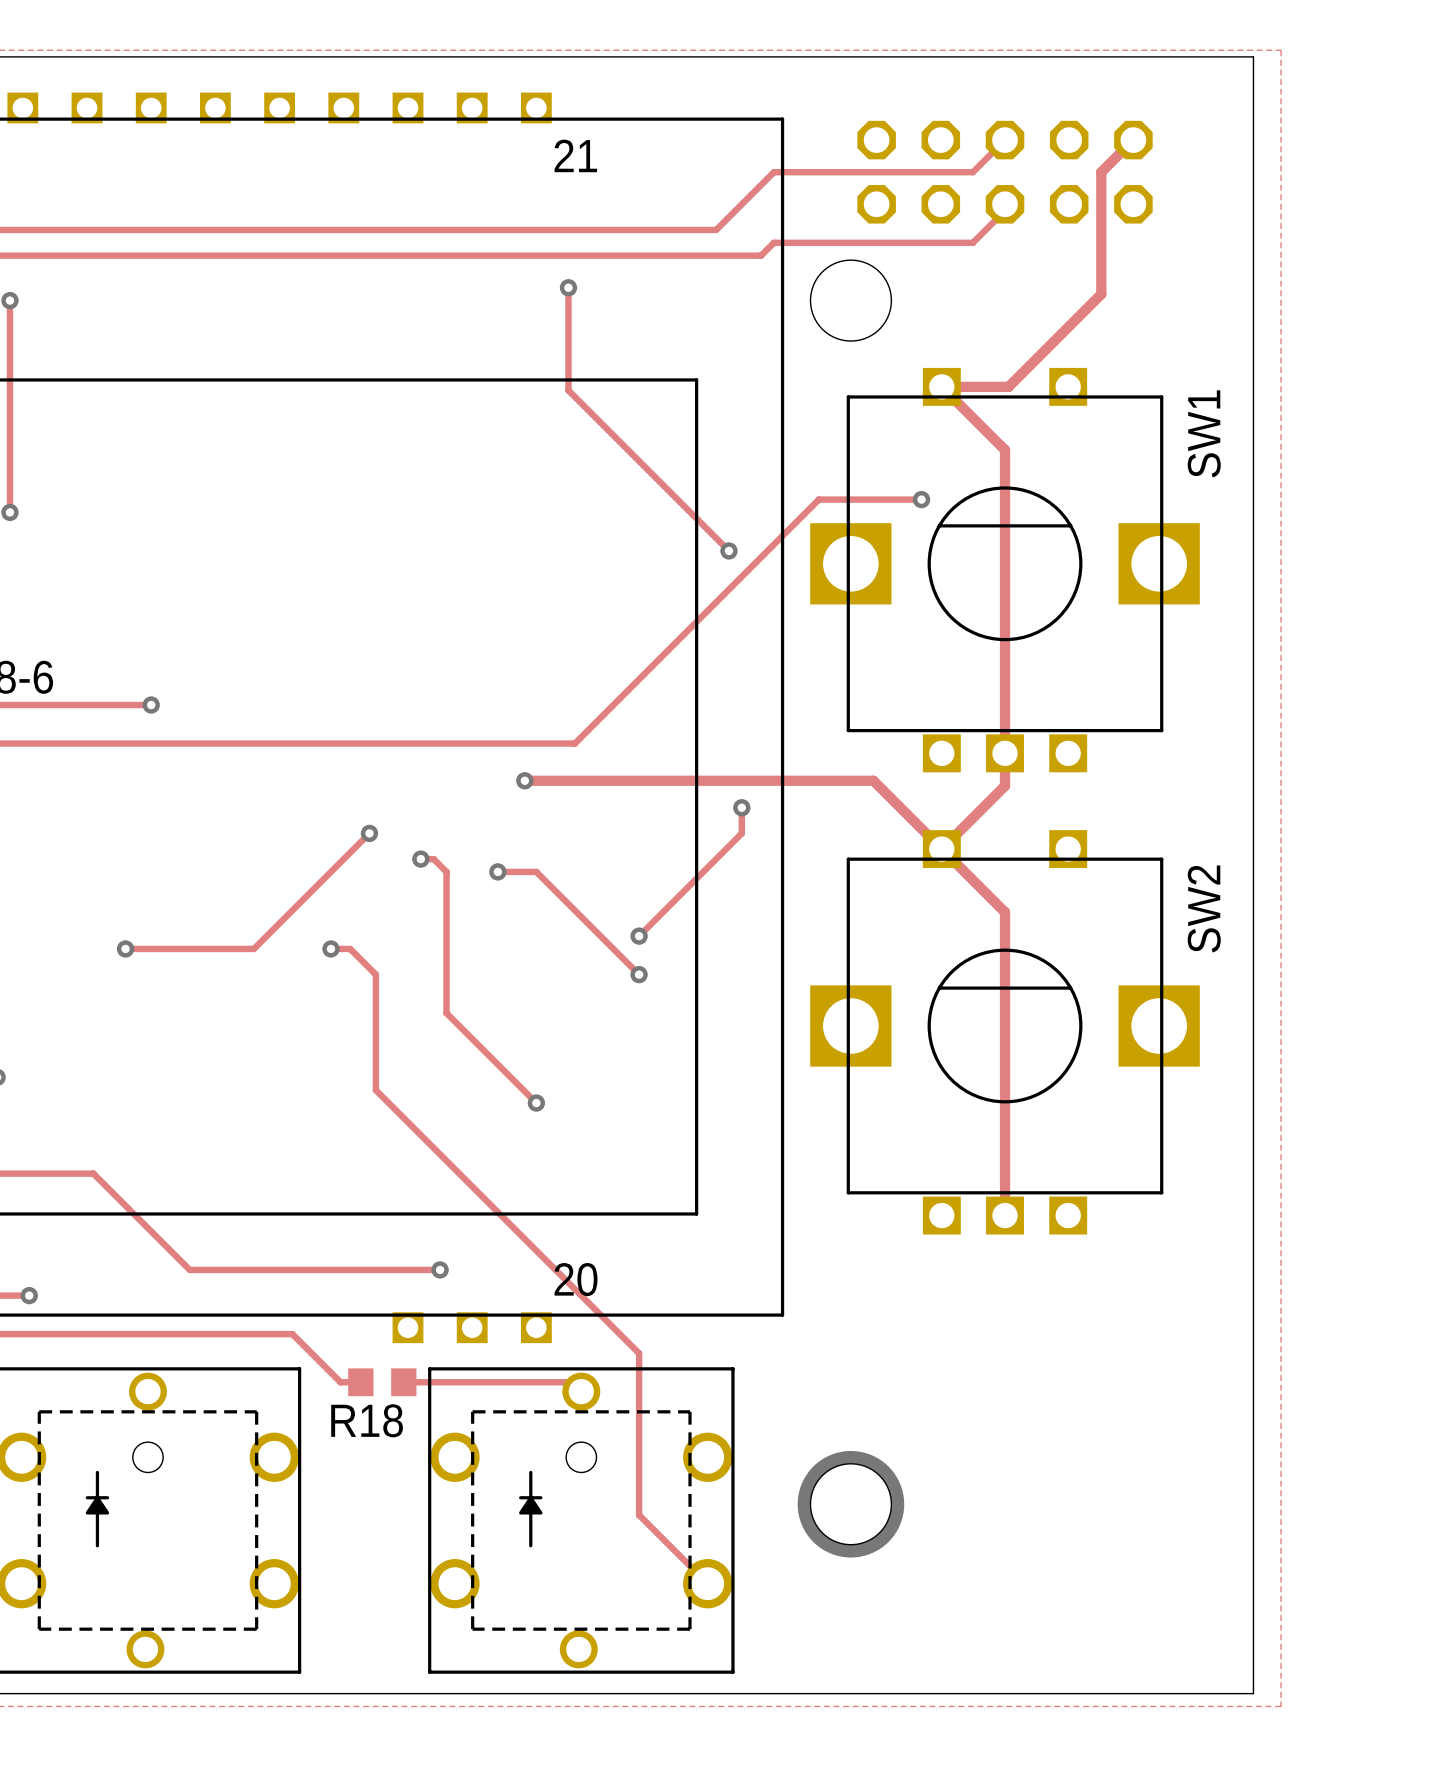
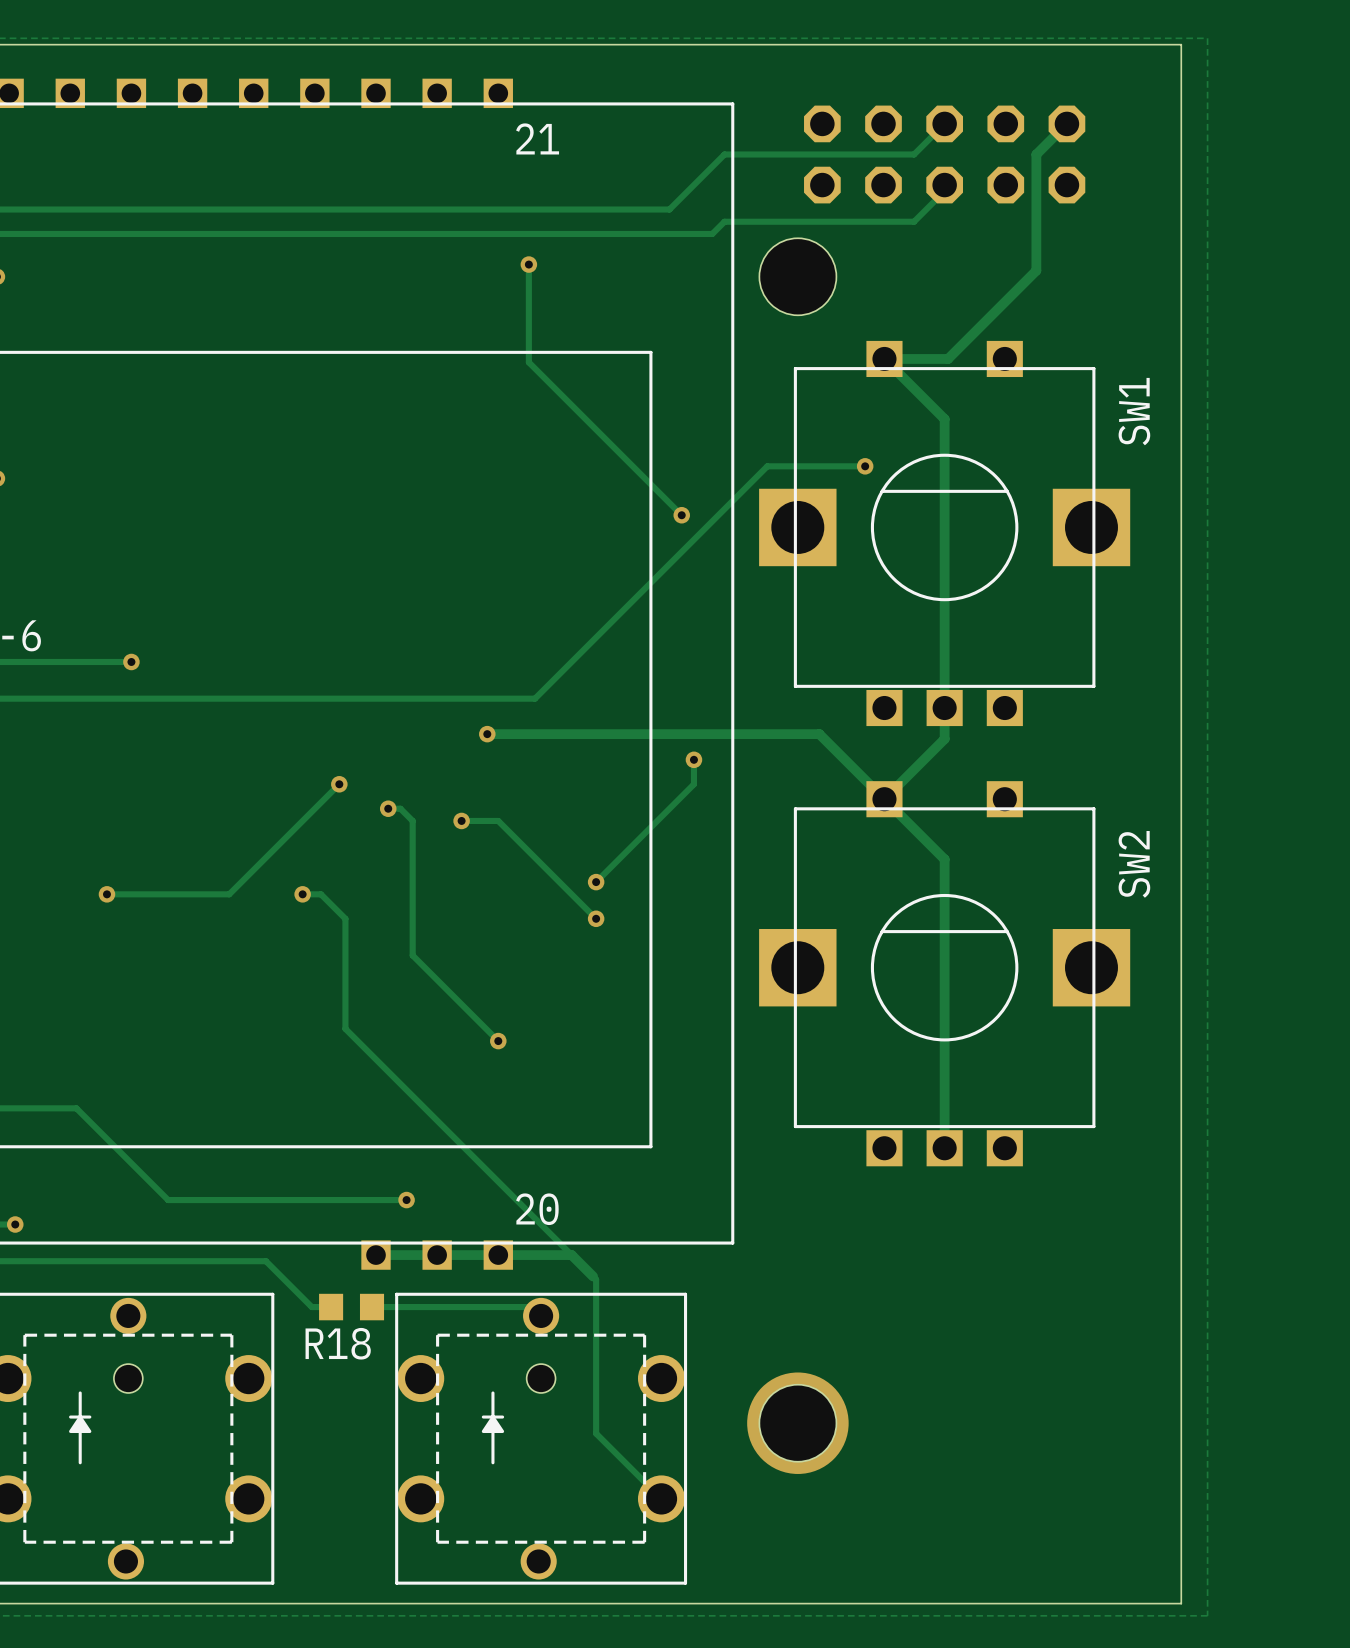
track: none -> (376, 1255) (571, 1255) (593, 1276)

